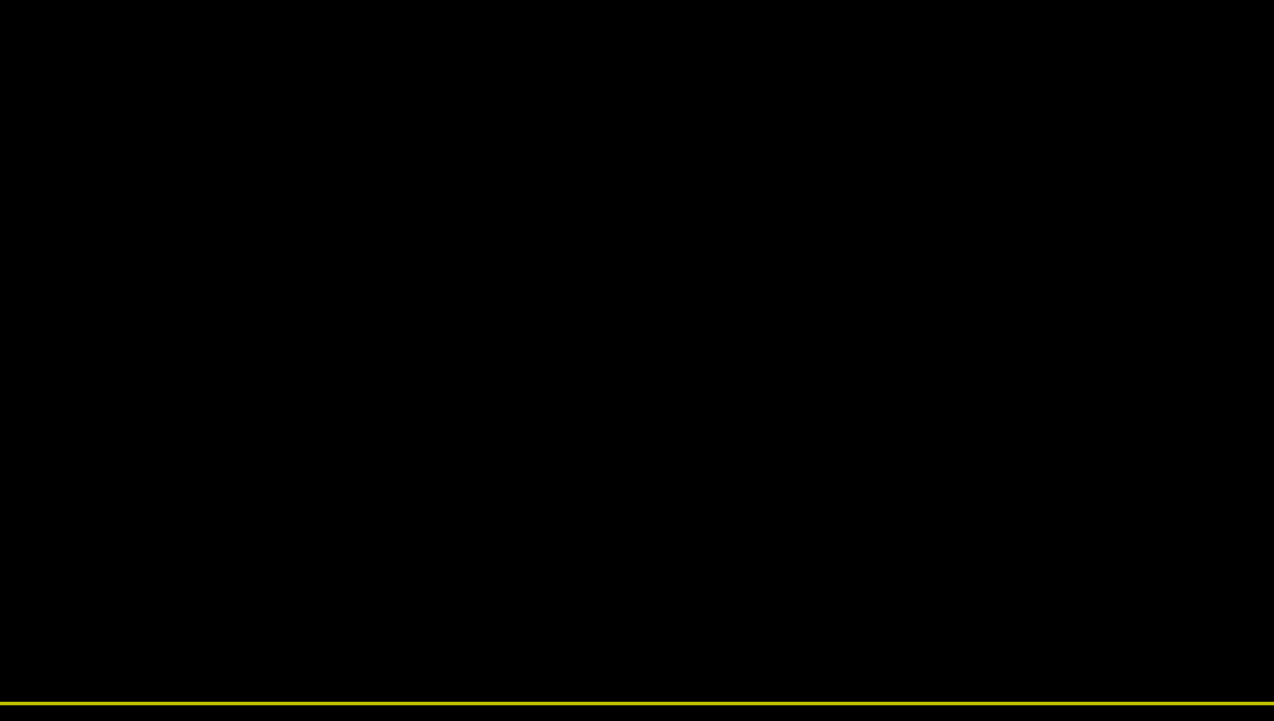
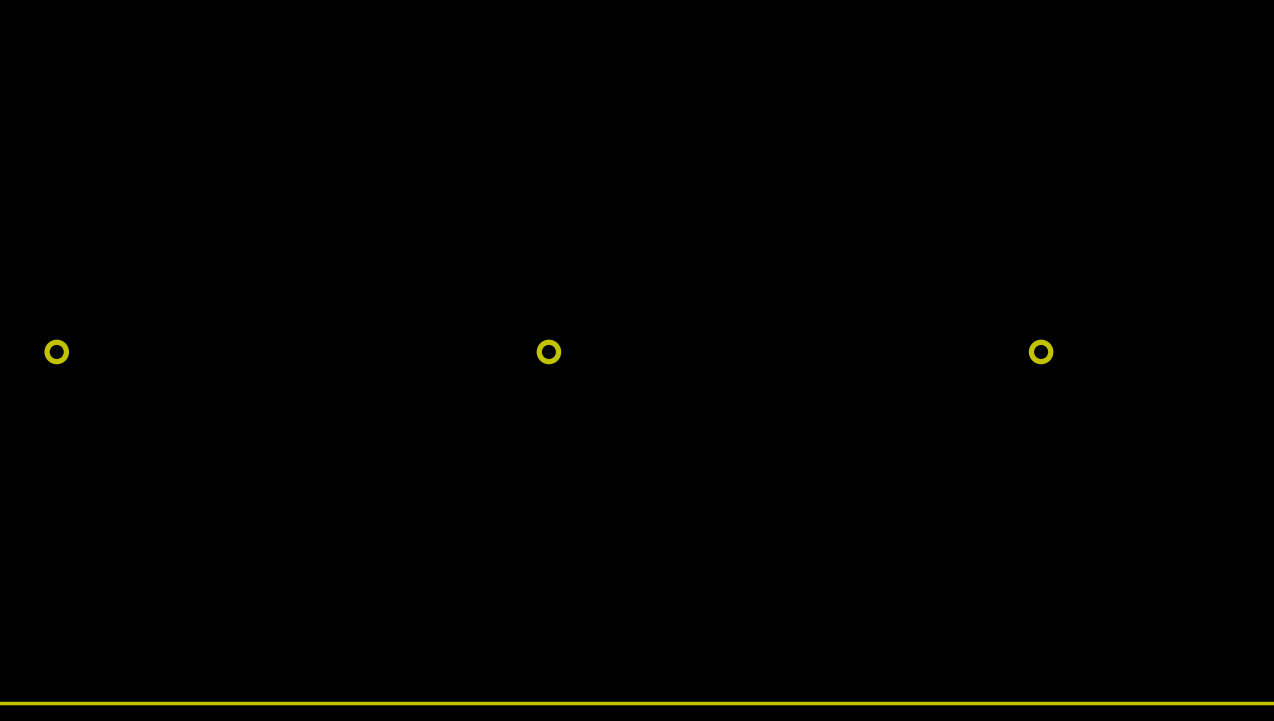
part: none -> (56, 351)
part: none -> (548, 351)
part: none -> (1041, 351)

